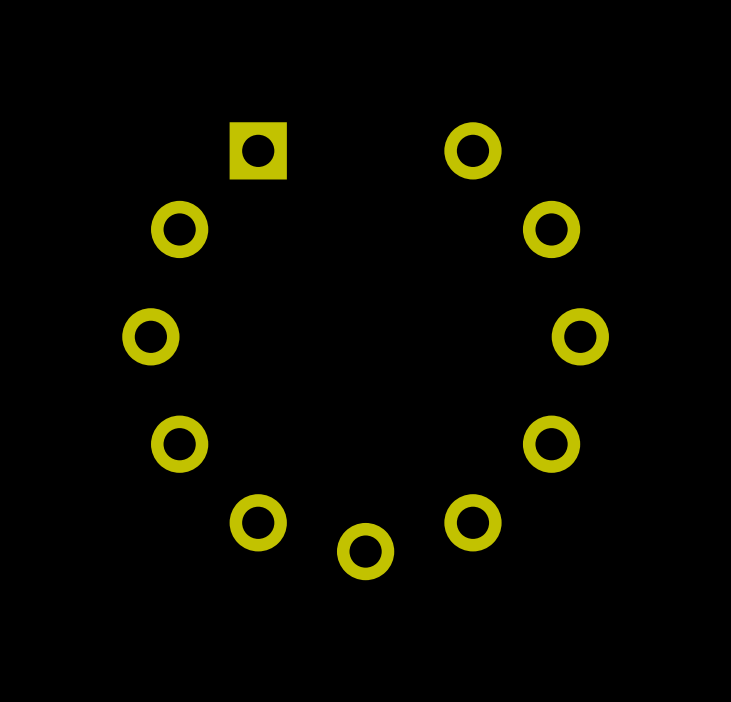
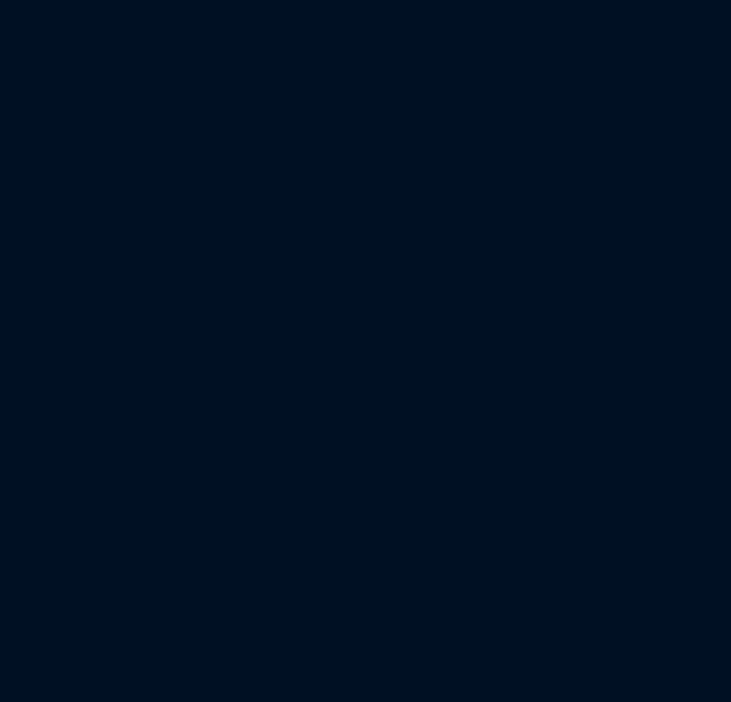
part: (365, 351) -> none

